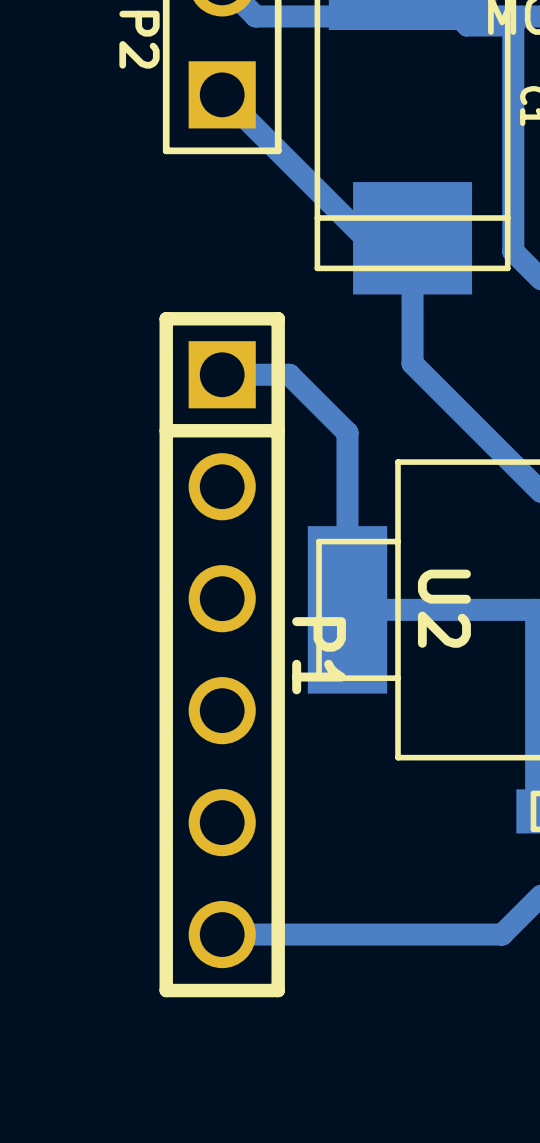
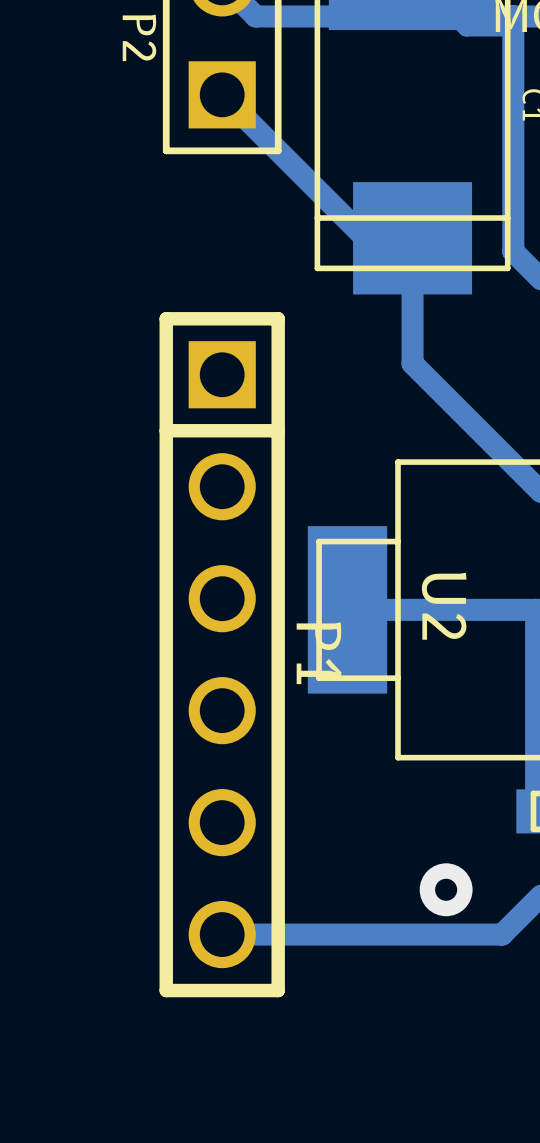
track: (222, 374) (289, 374) (347, 432) (347, 609) -> none
via: none -> (446, 889)

